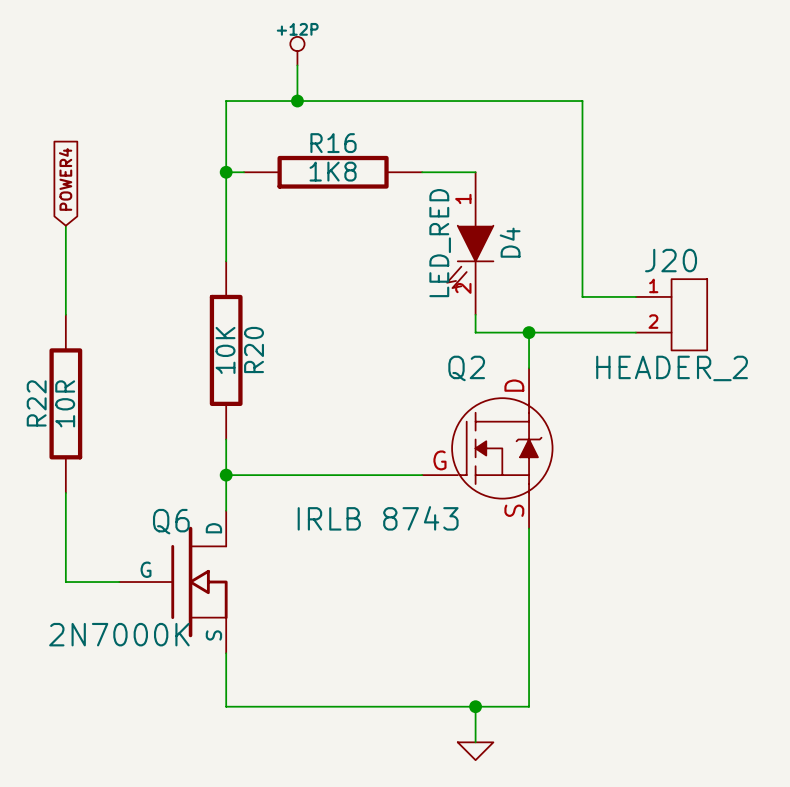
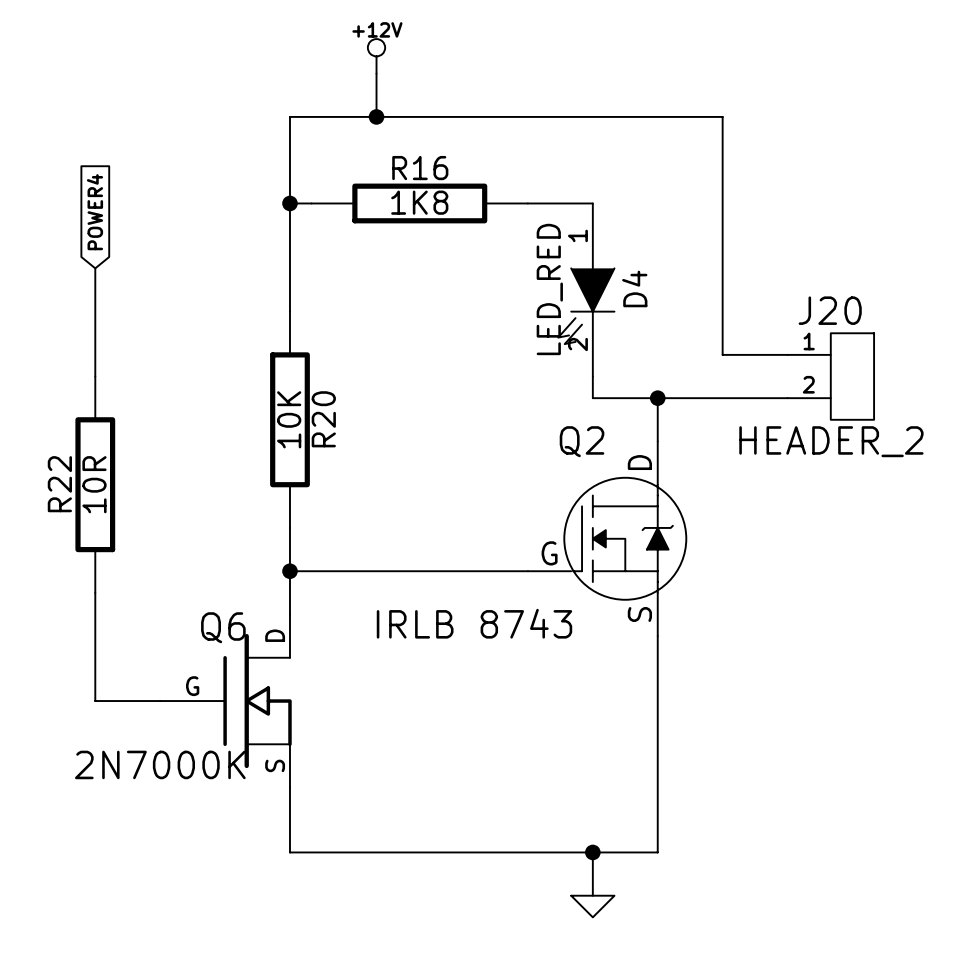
power symbol: +12P (297, 51) -> +12V (376, 56)

